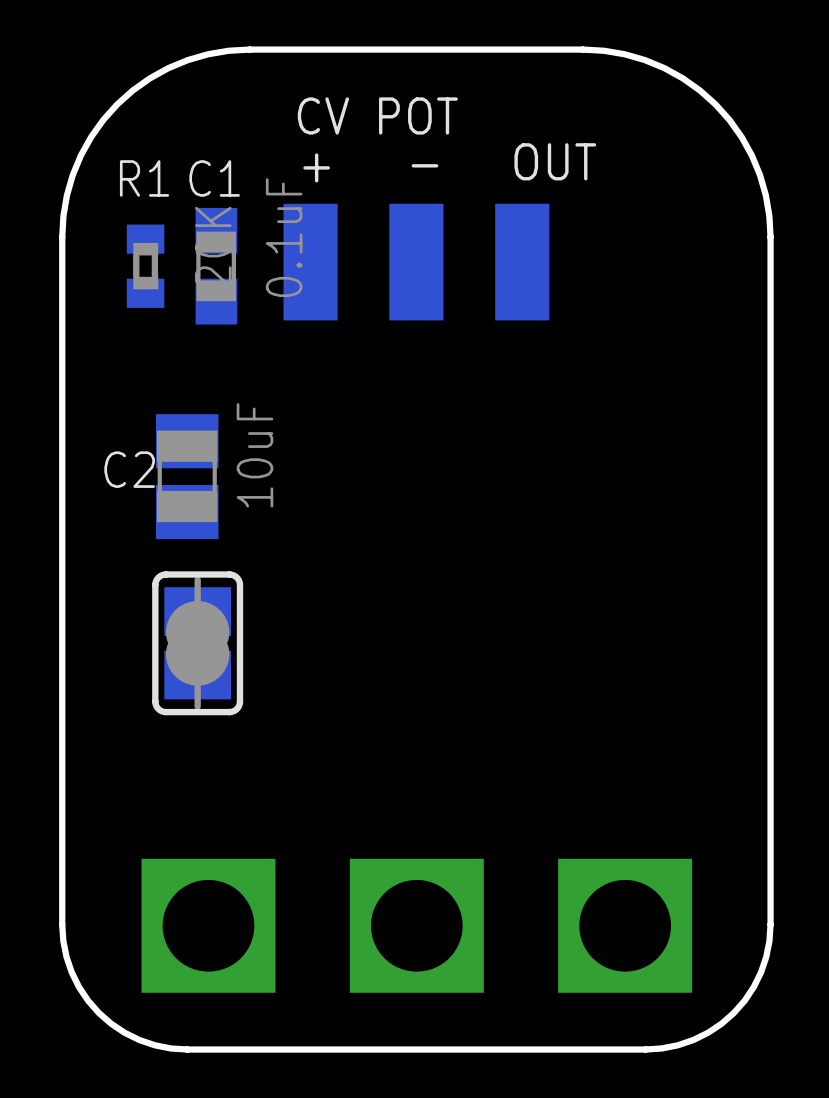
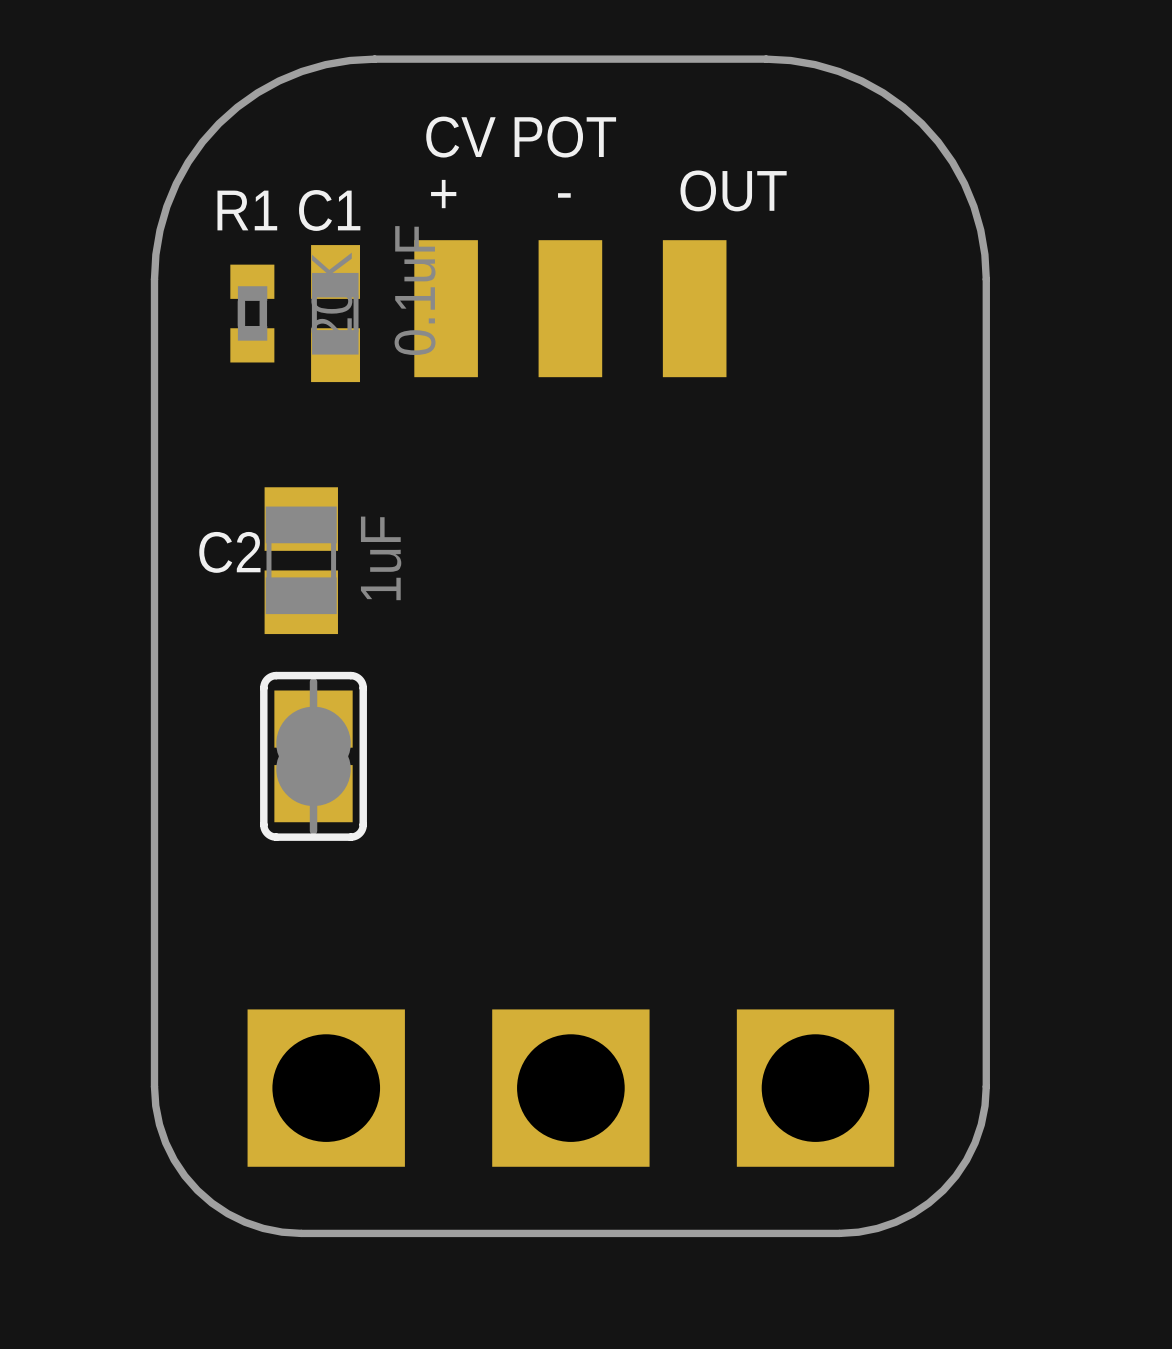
C2 value: 10uF (254, 455) -> 1uF (381, 558)

